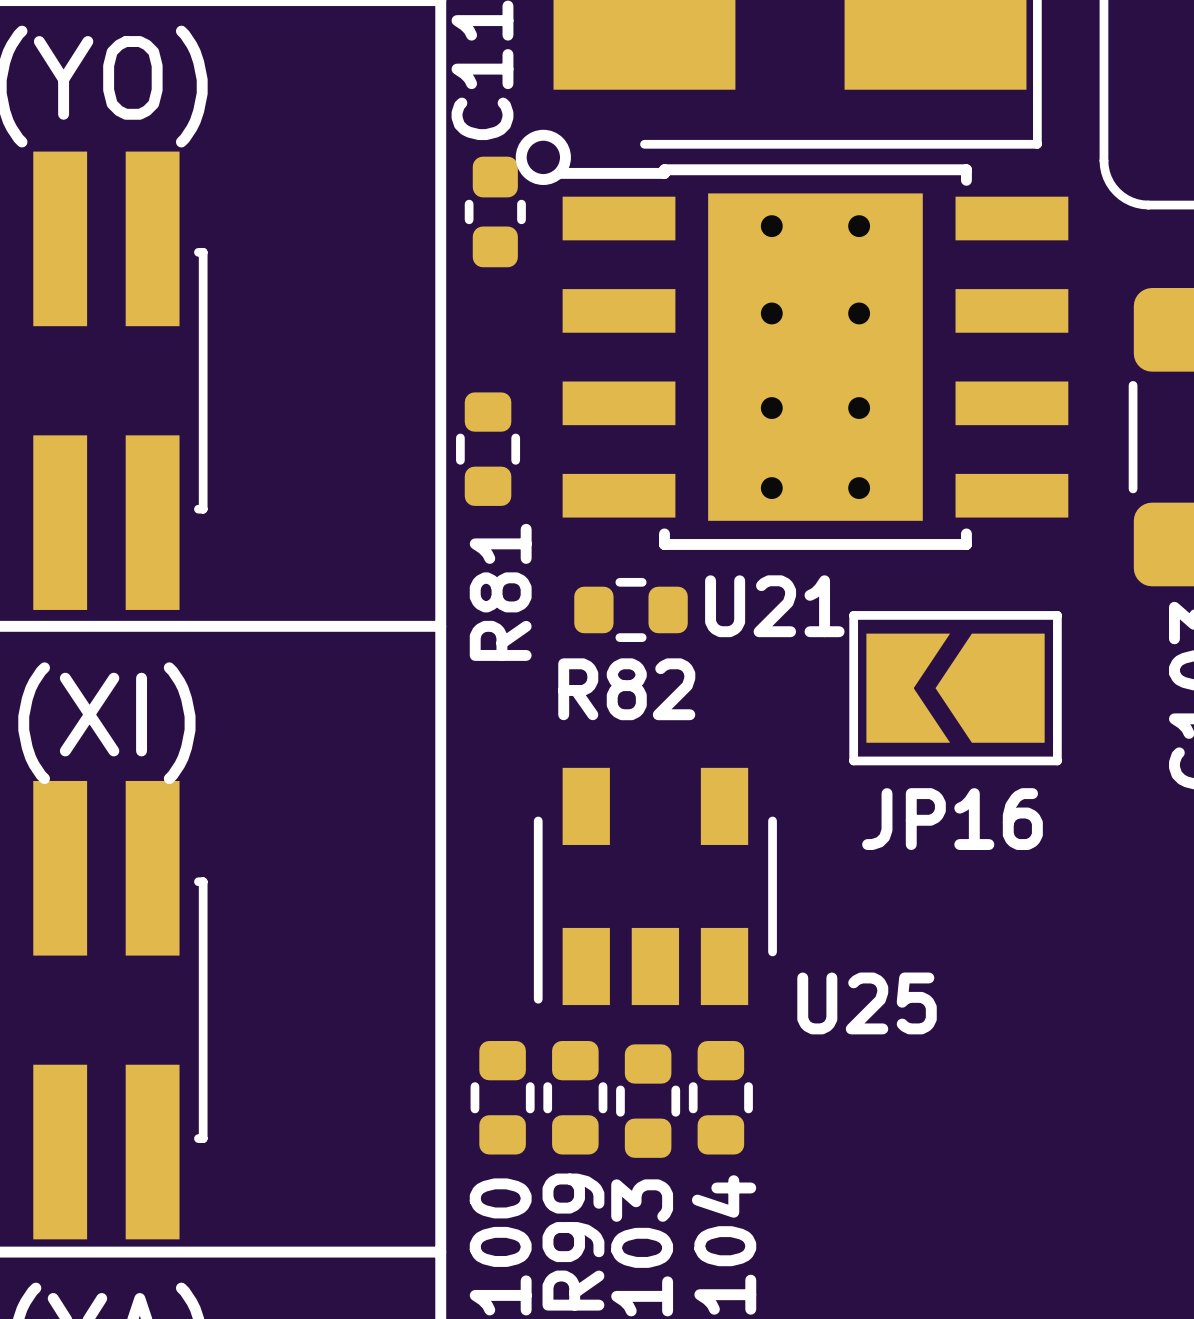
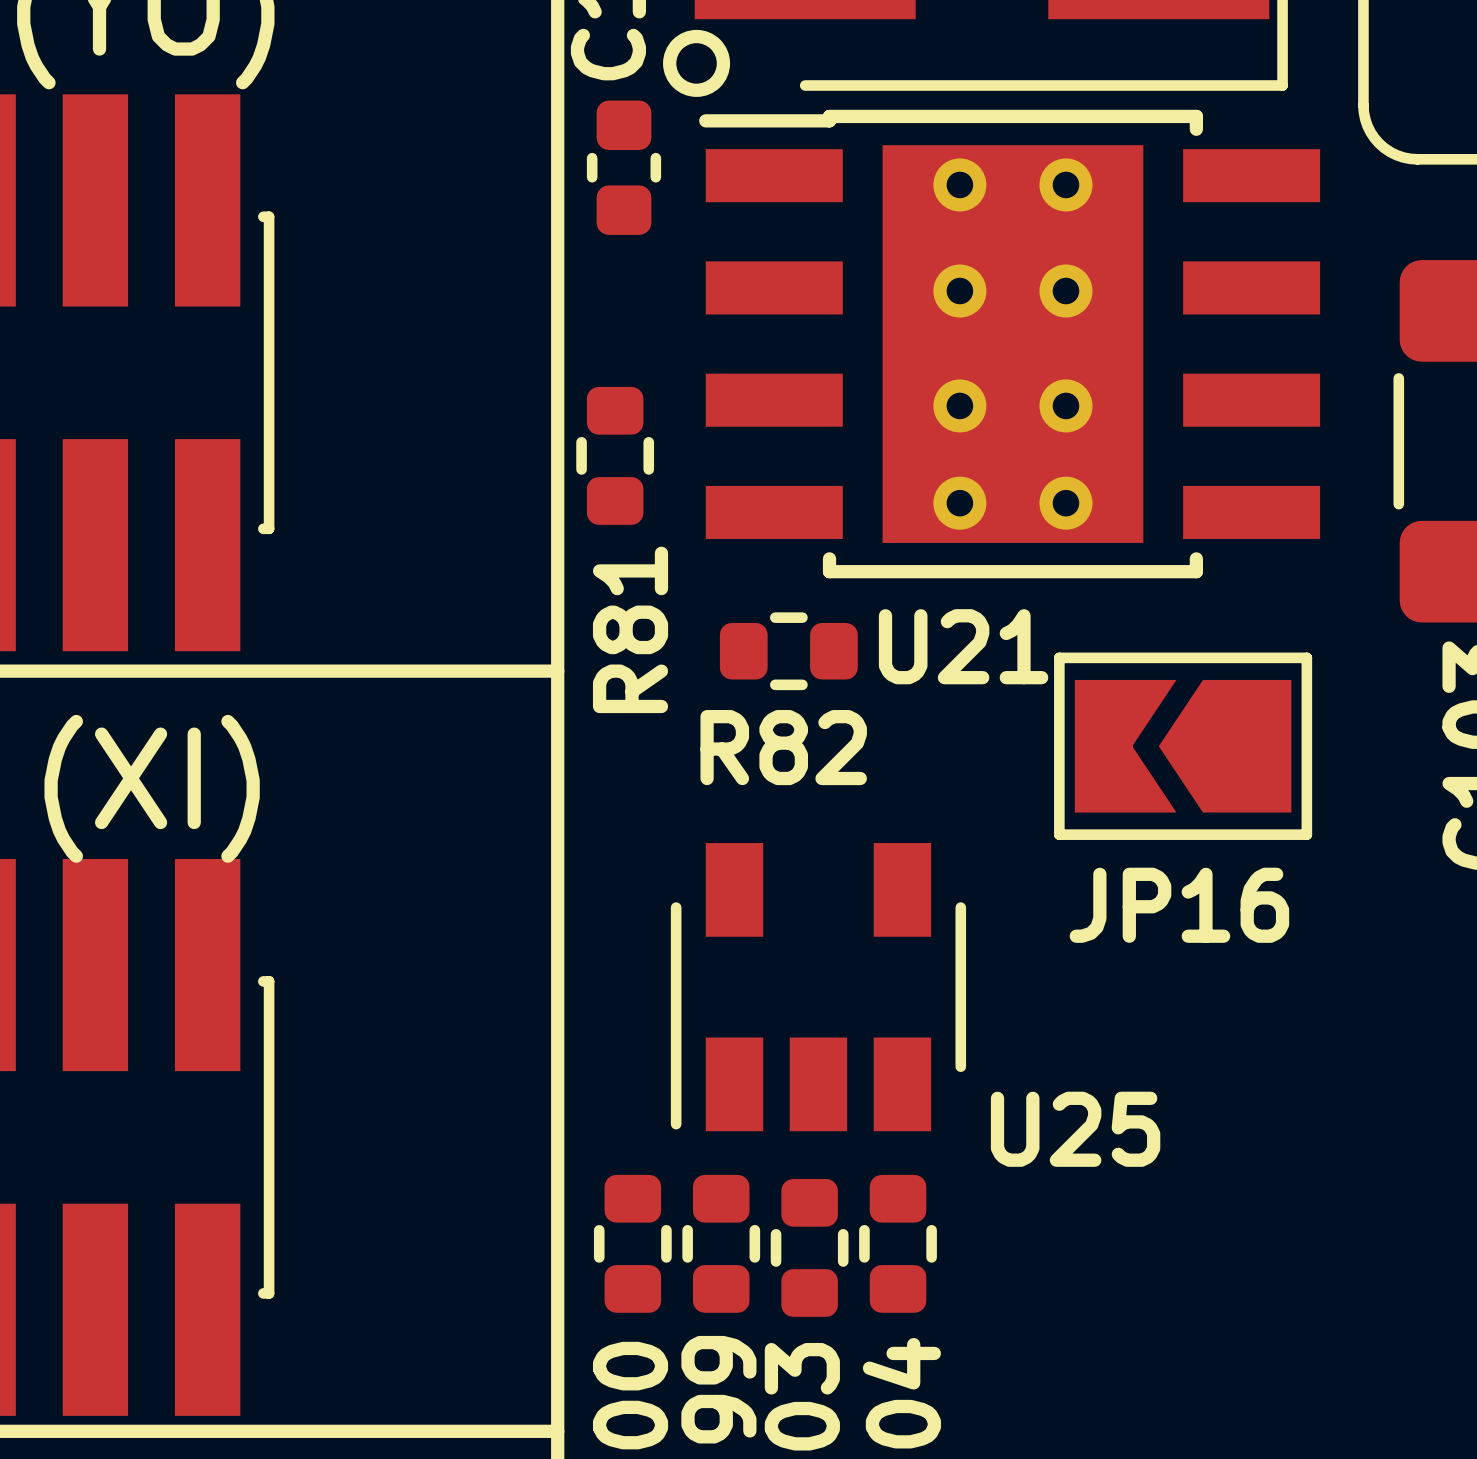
drawing position: (543, 157) -> (696, 63)

